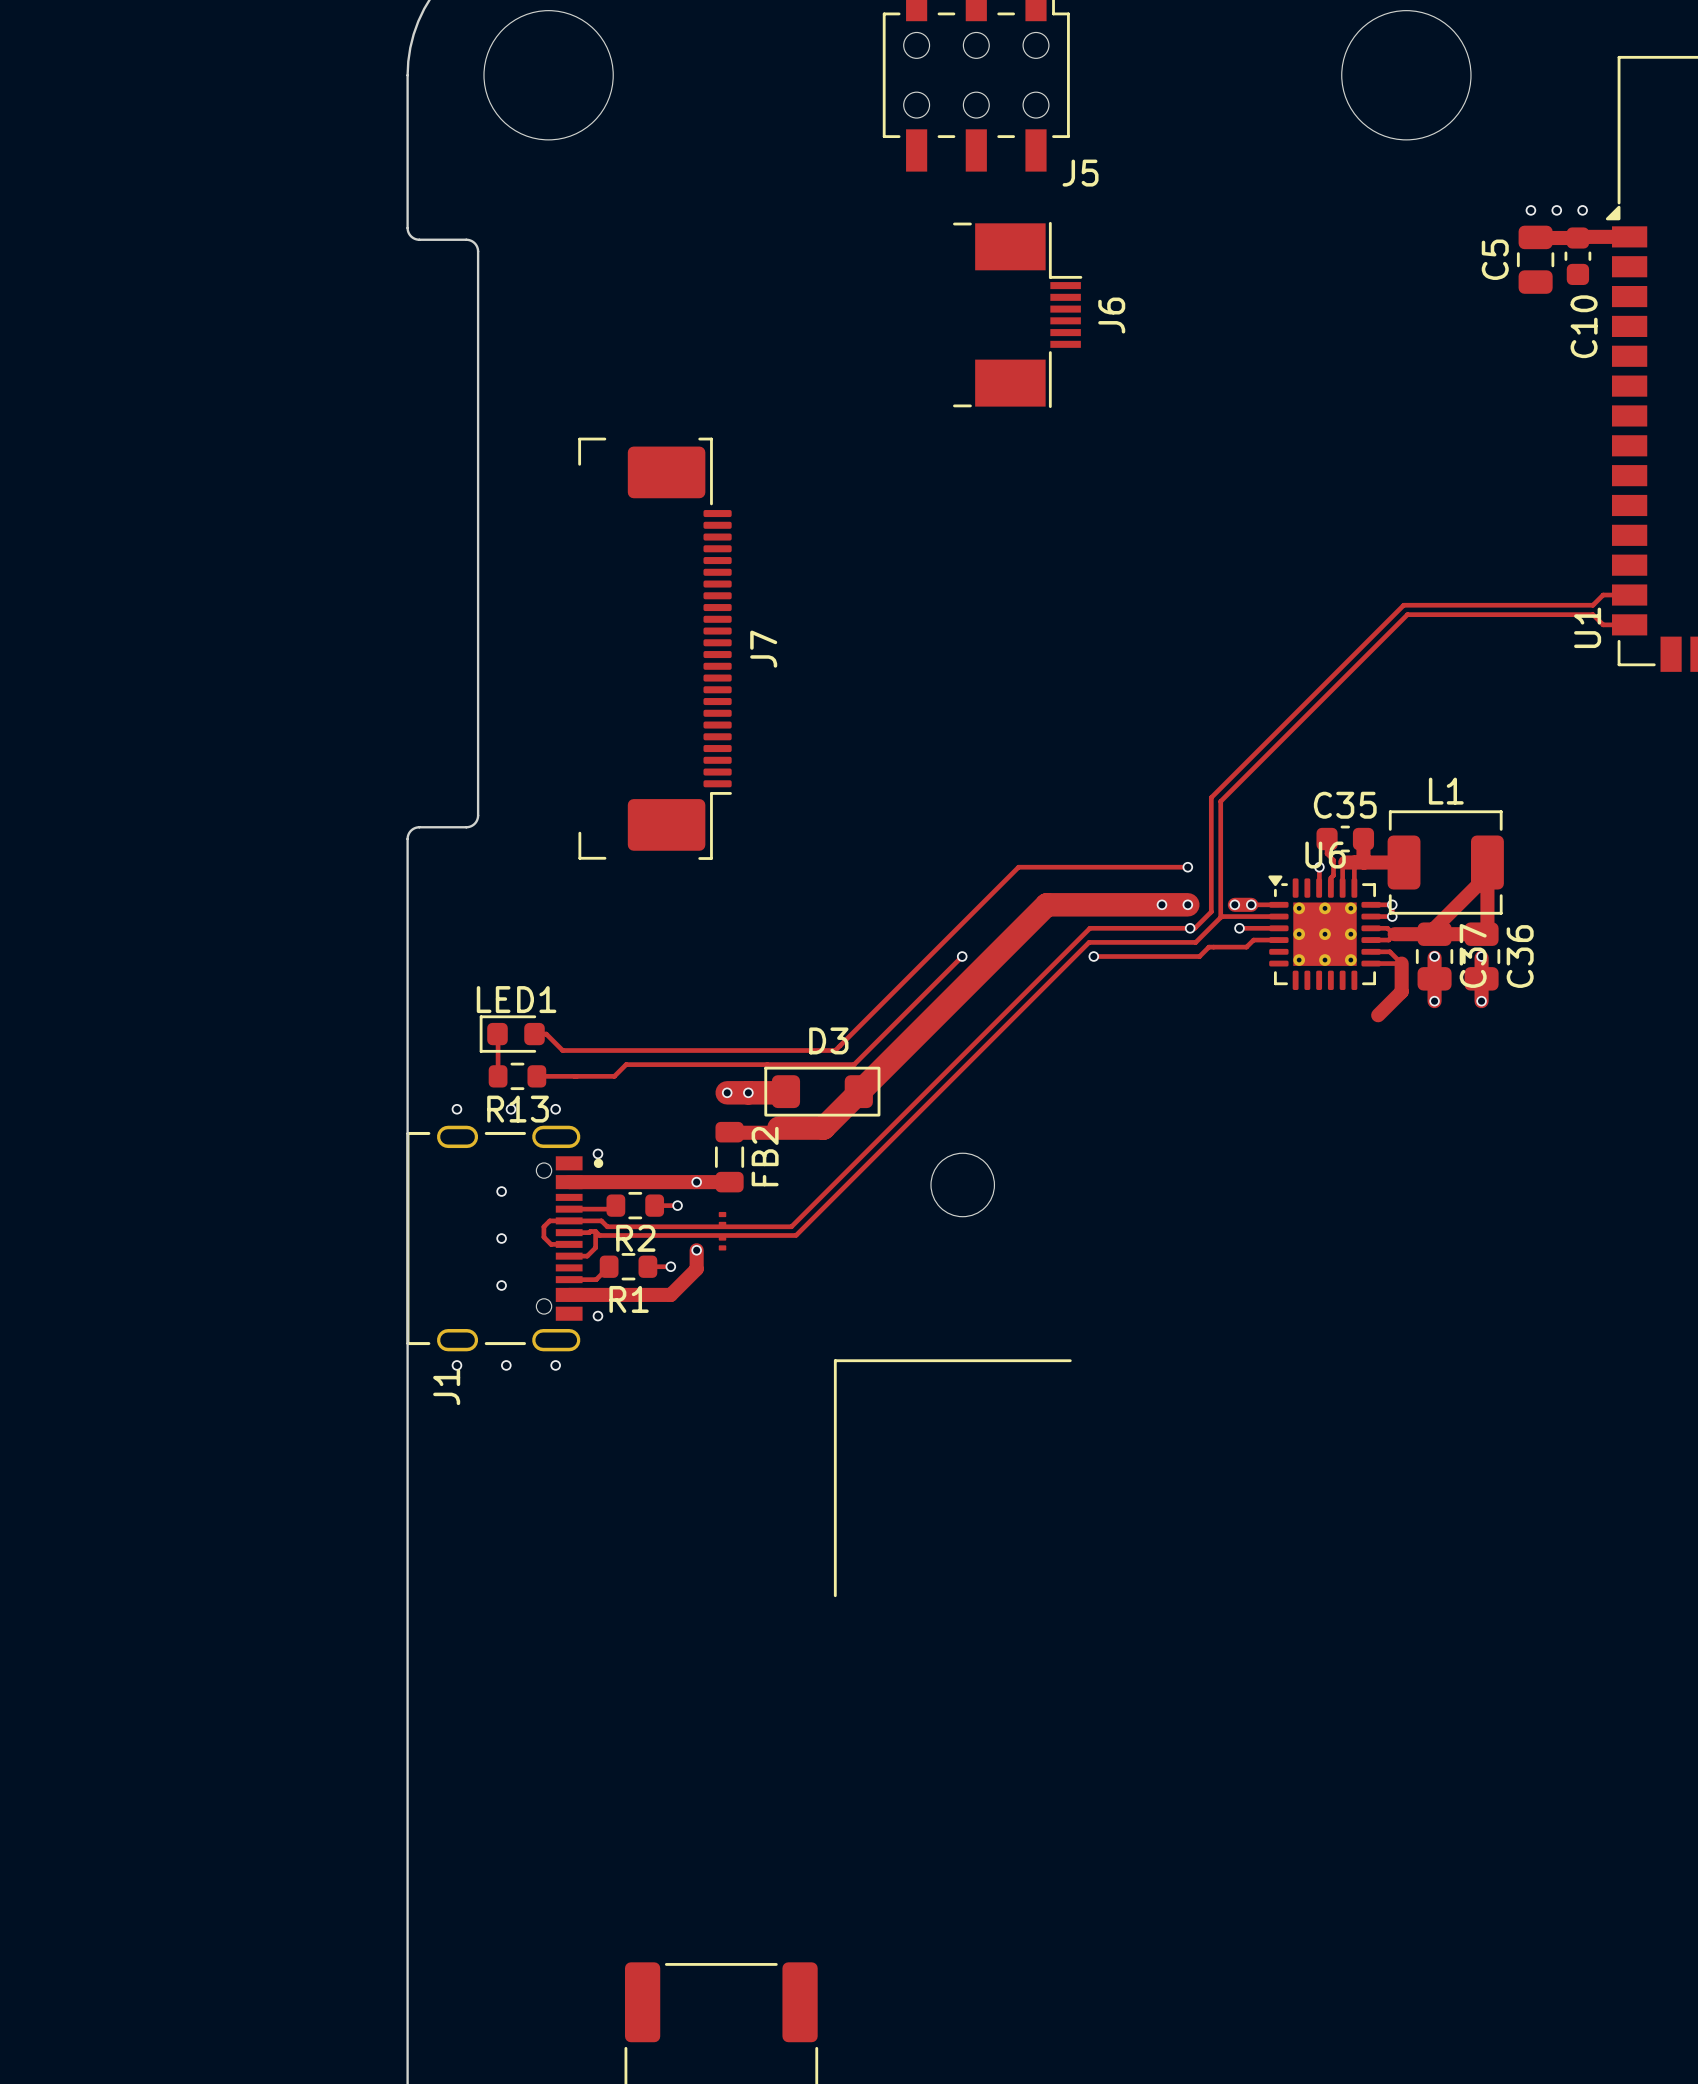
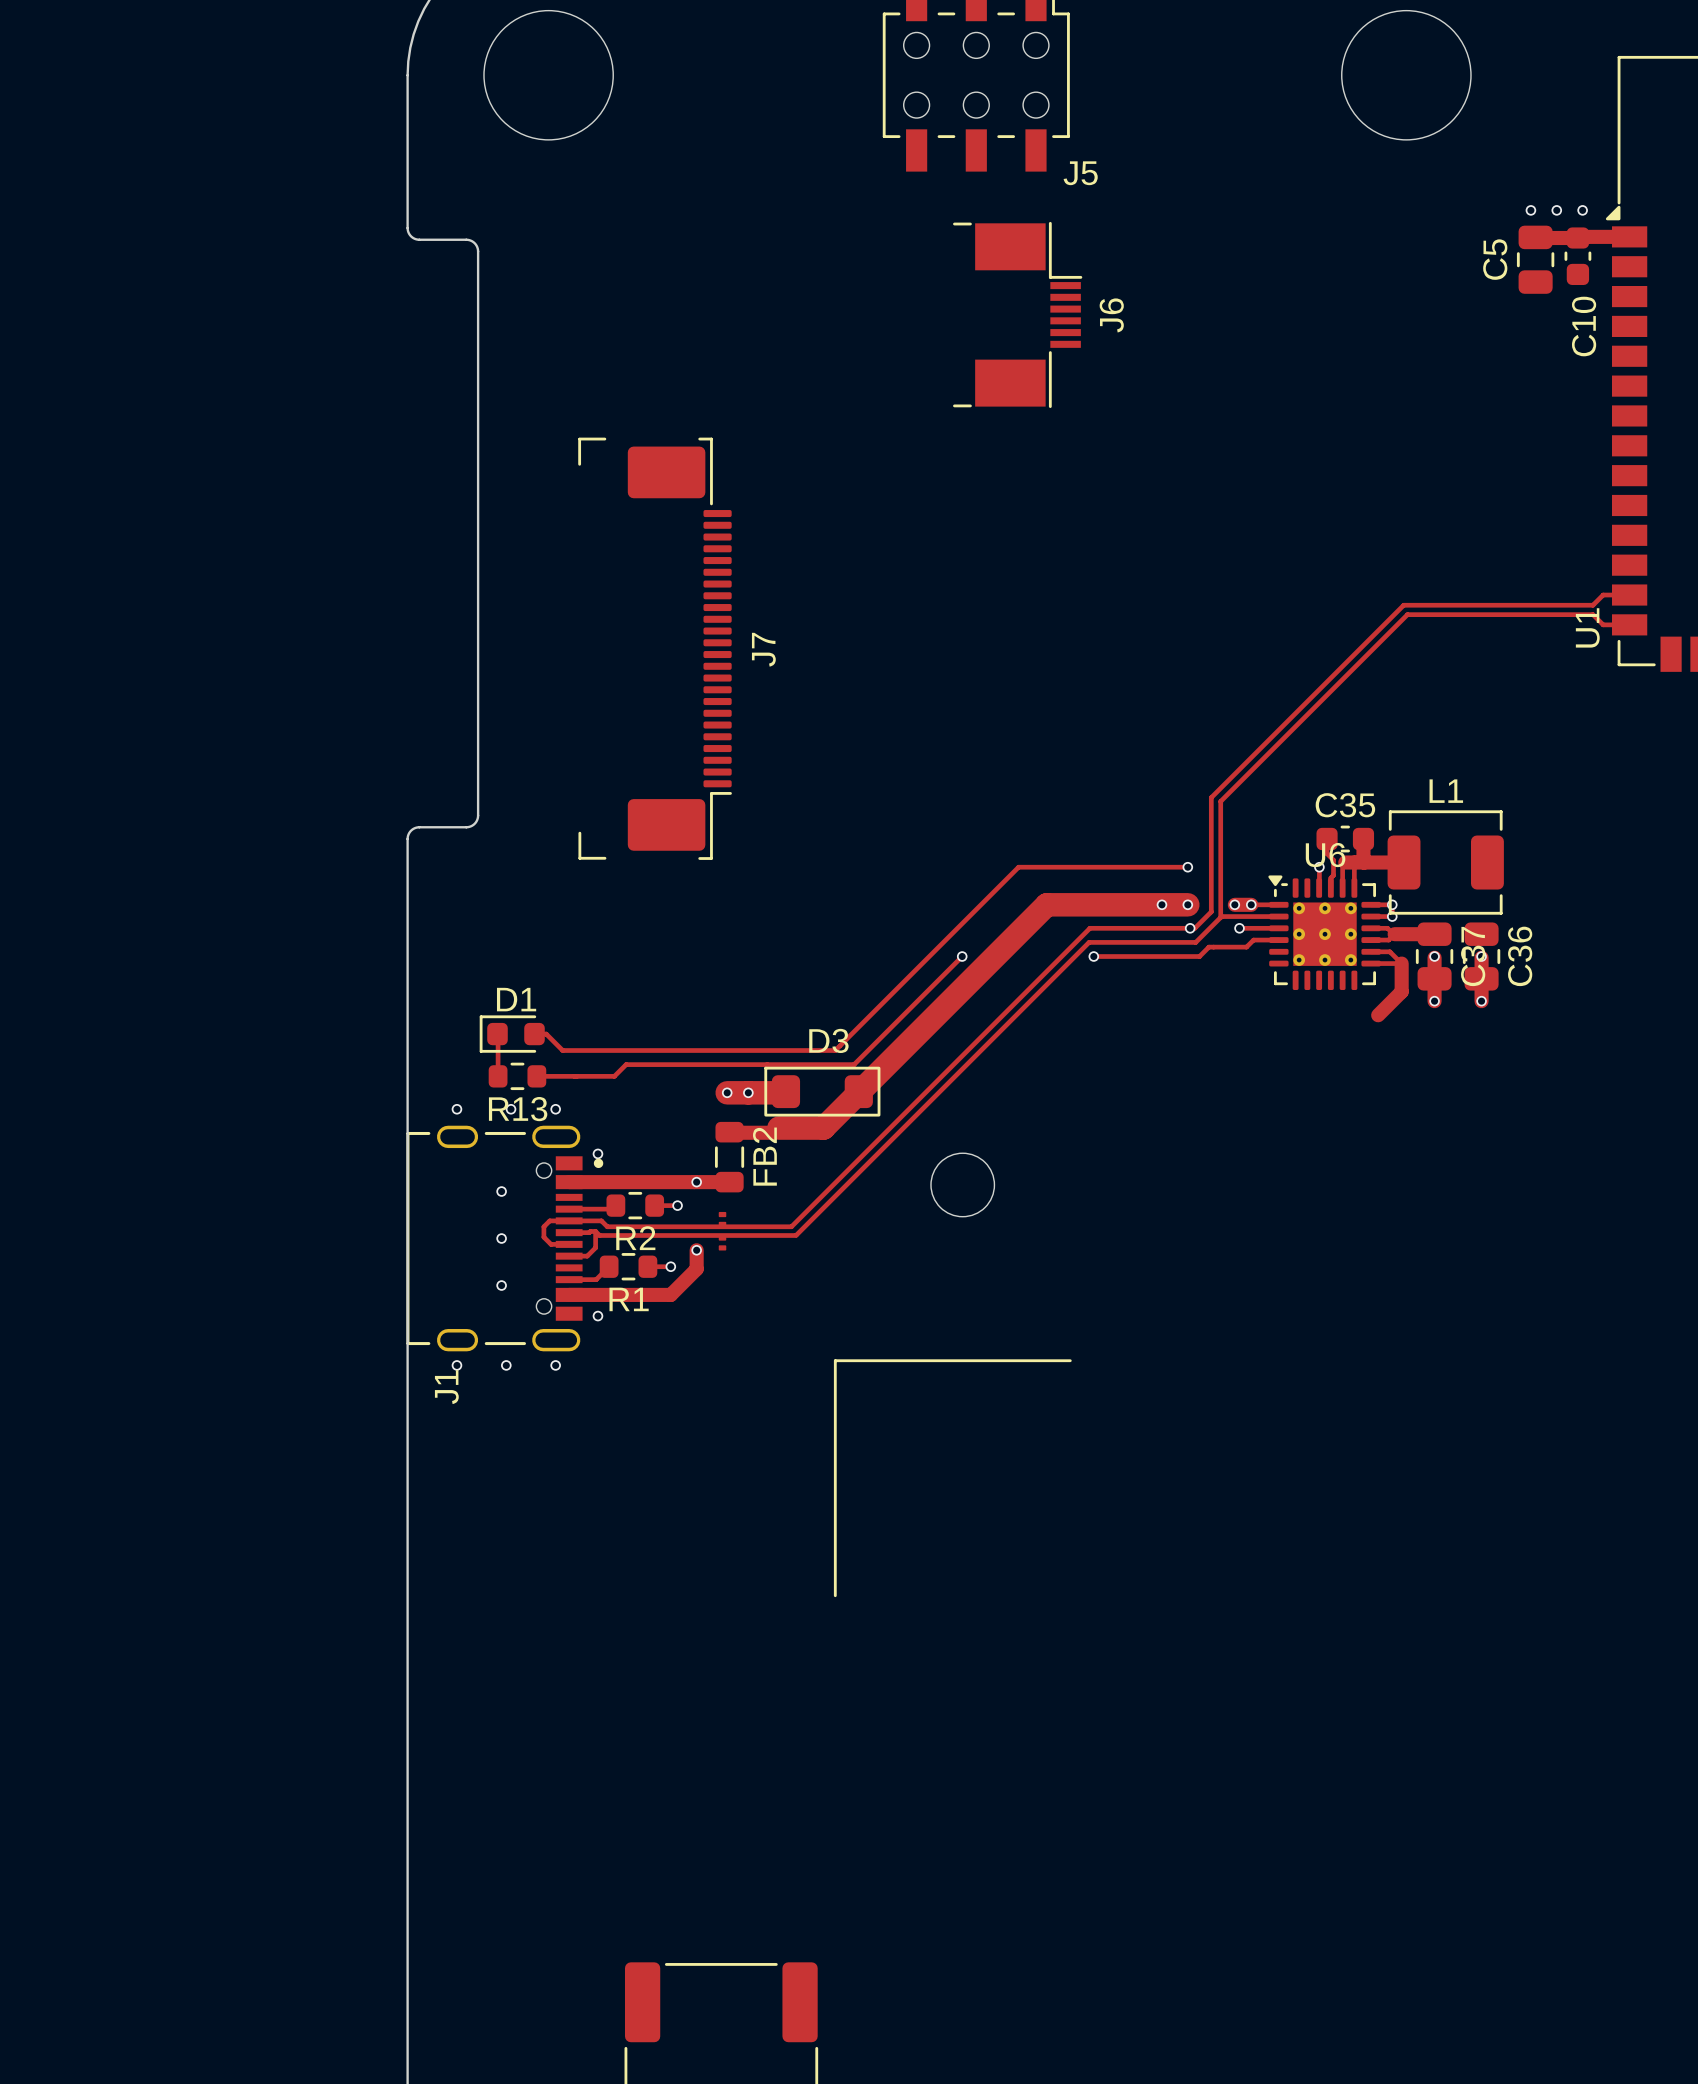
track: (1487, 875) (1434, 928) (1434, 934) (1481, 934) (1487, 928) (1487, 875) -> none
LED1 name: LED1 (516, 999) -> D1 (516, 999)

